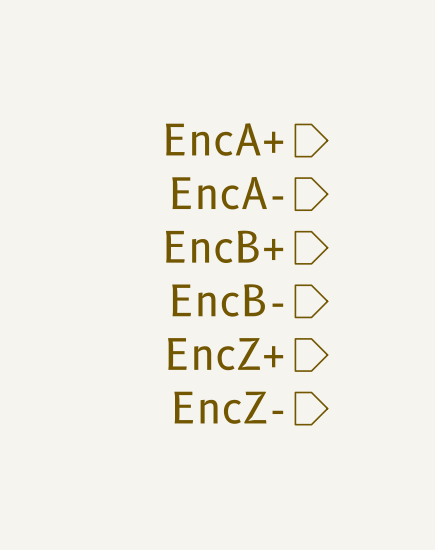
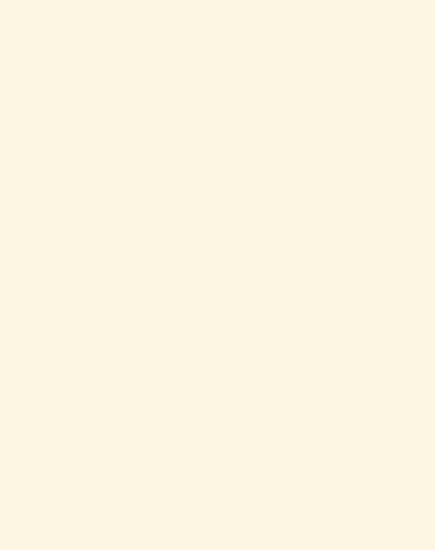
hierarchical label: EncA+ (224, 139) -> none
hierarchical label: EncA- (227, 193) -> none
hierarchical label: EncB+ (224, 246) -> none
hierarchical label: EncB- (227, 300) -> none
hierarchical label: EncZ+ (225, 354) -> none
hierarchical label: EncZ- (228, 407) -> none

